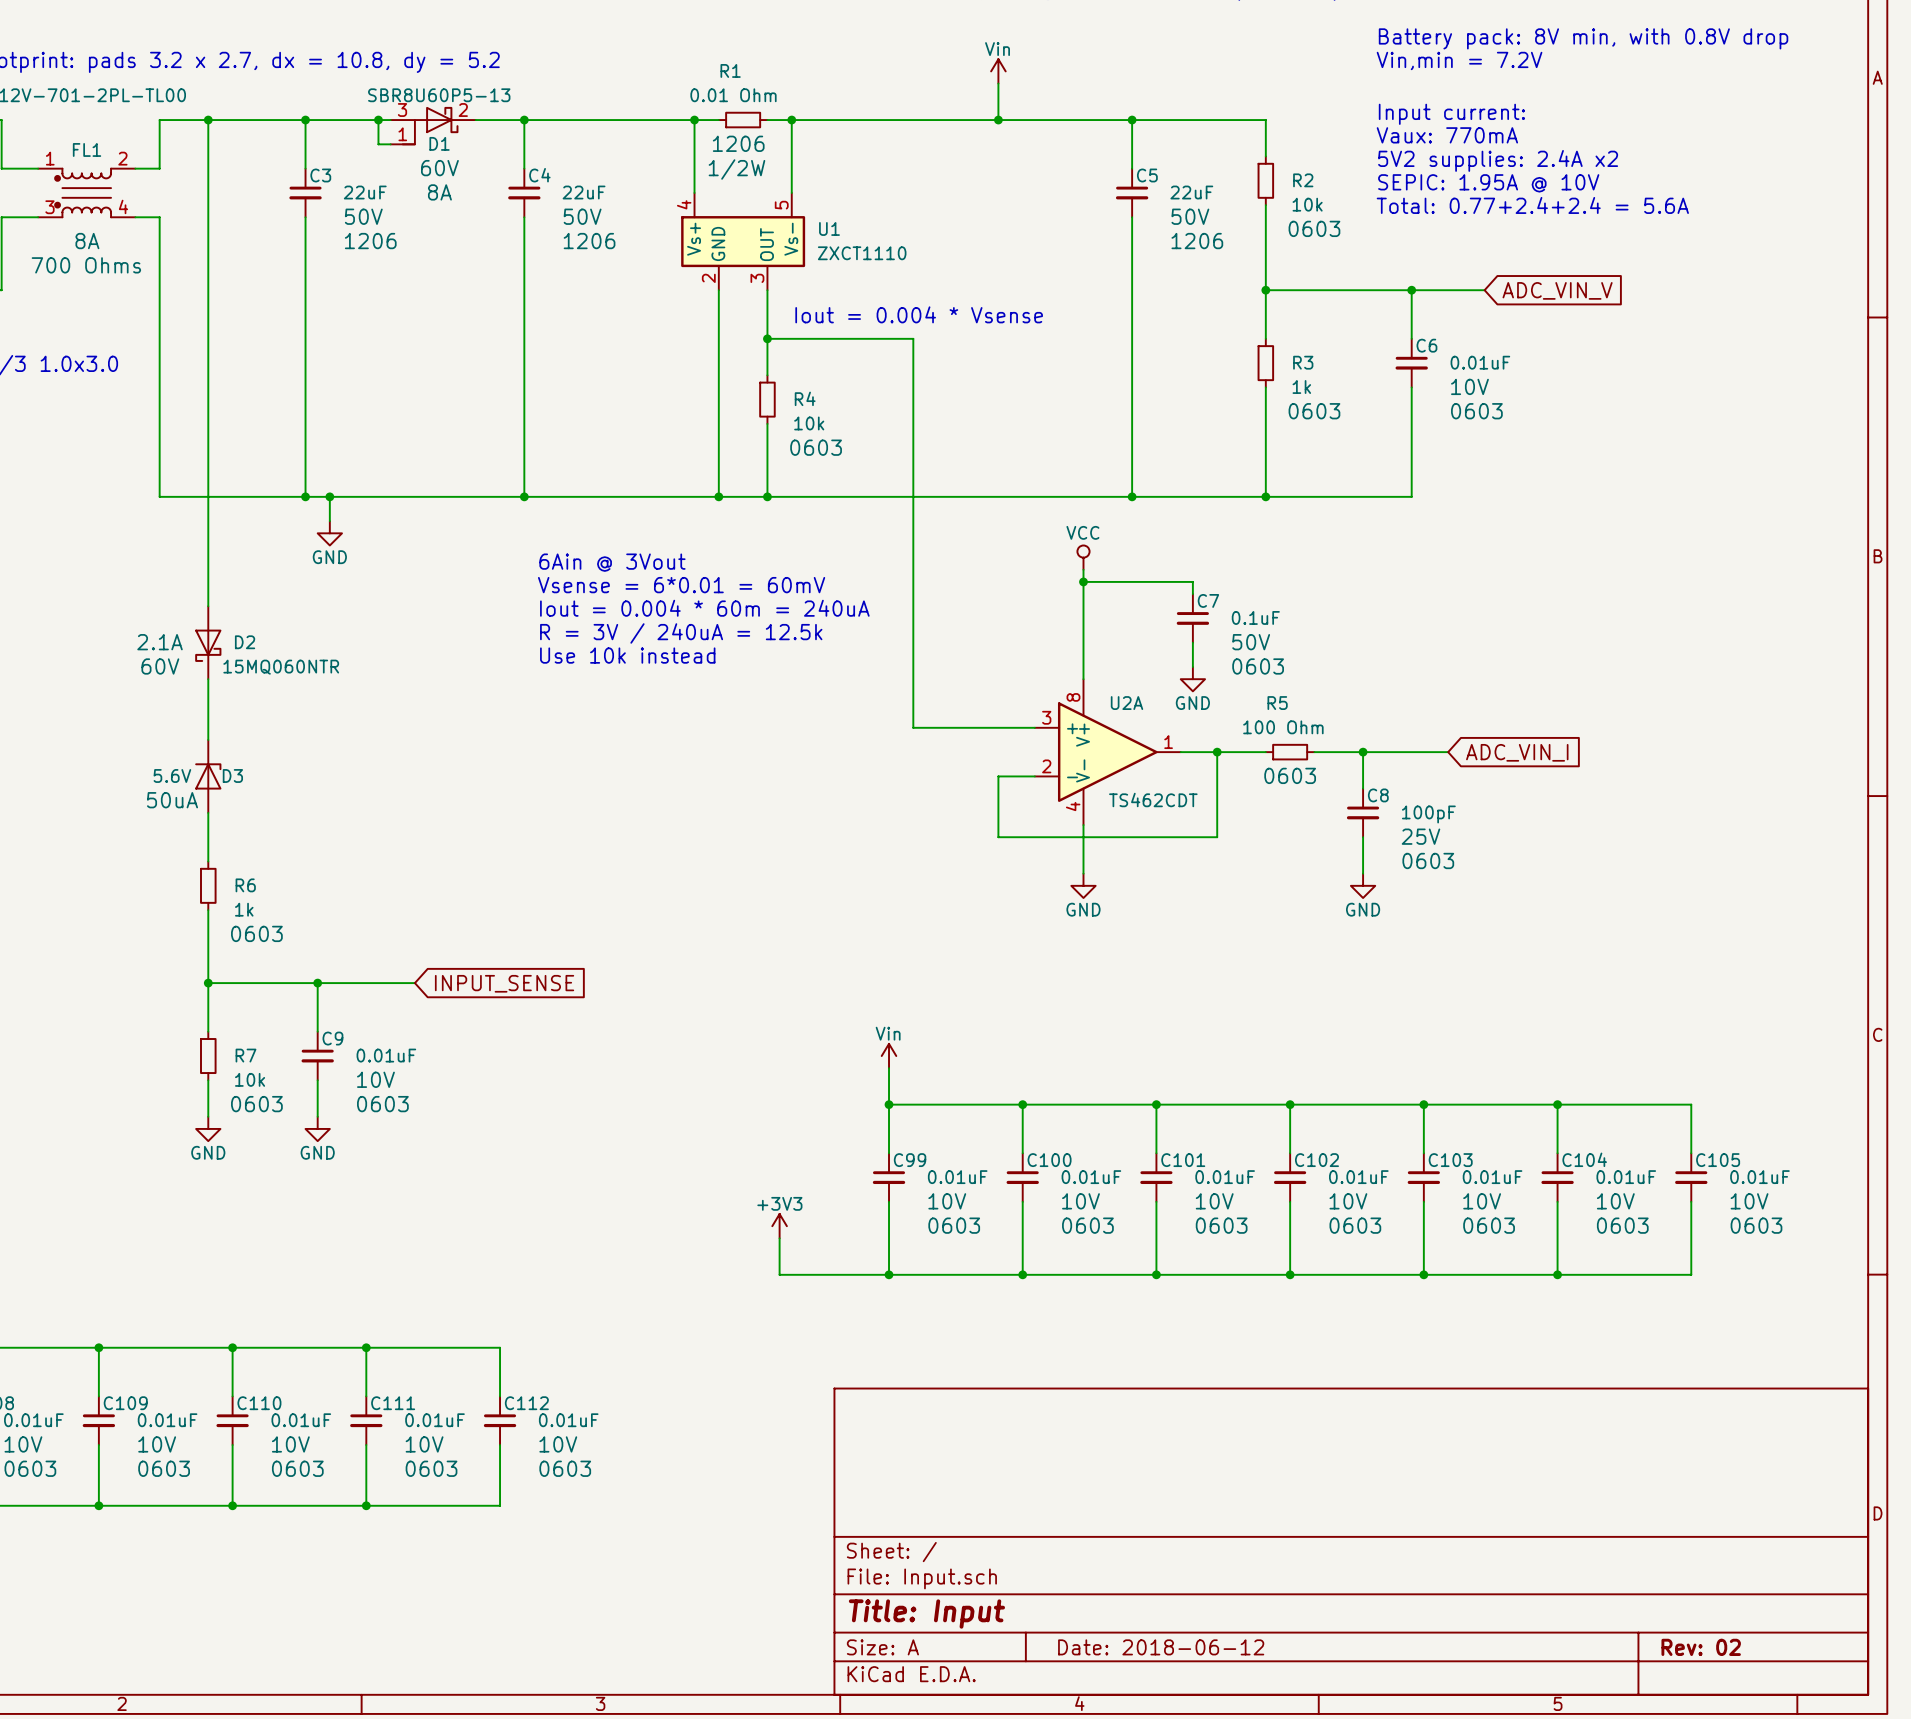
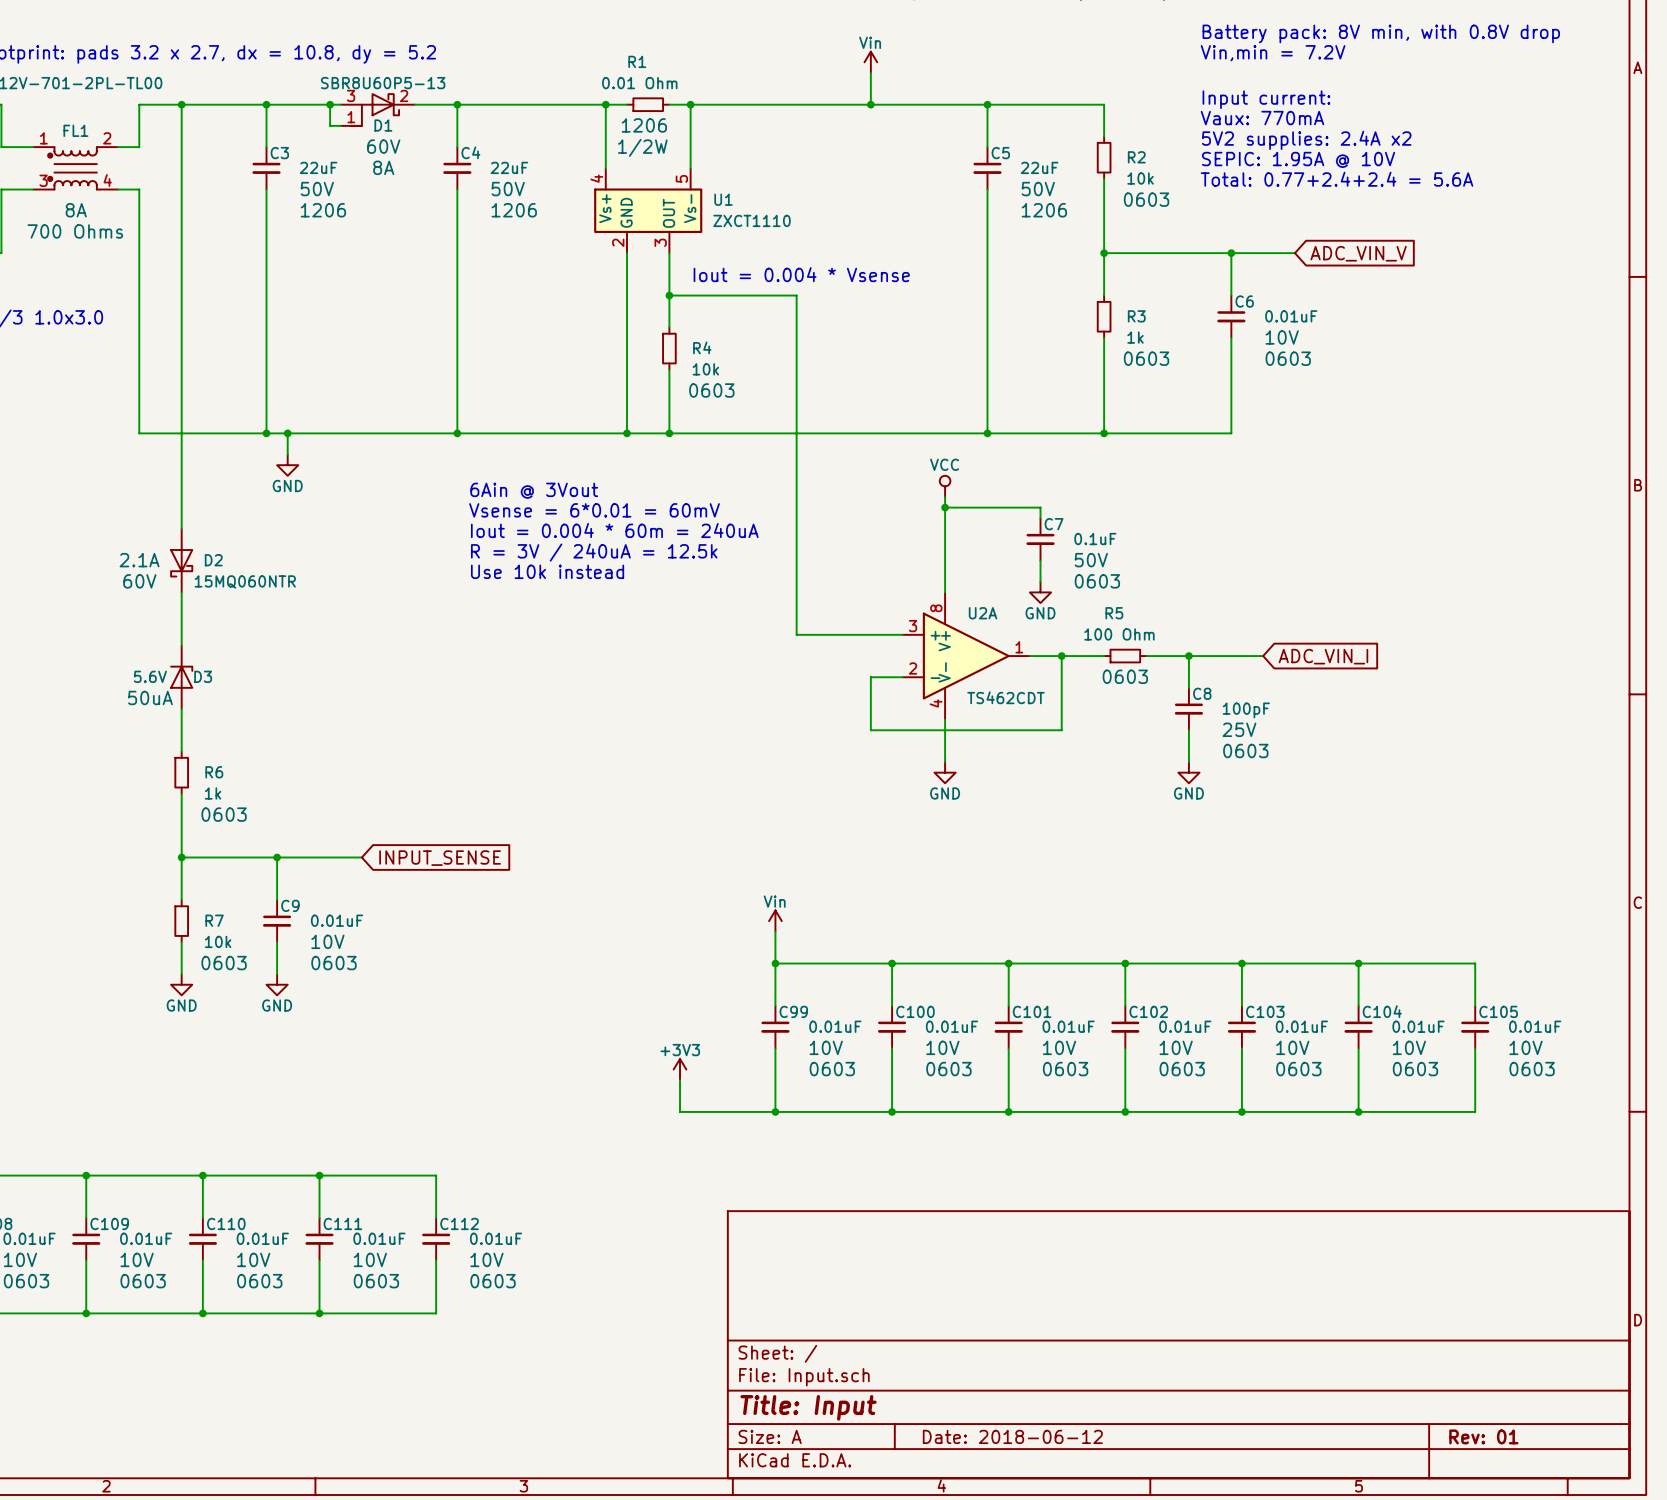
title block: Rev: 02 (1701, 1647) -> Rev: 01 (1483, 1436)

